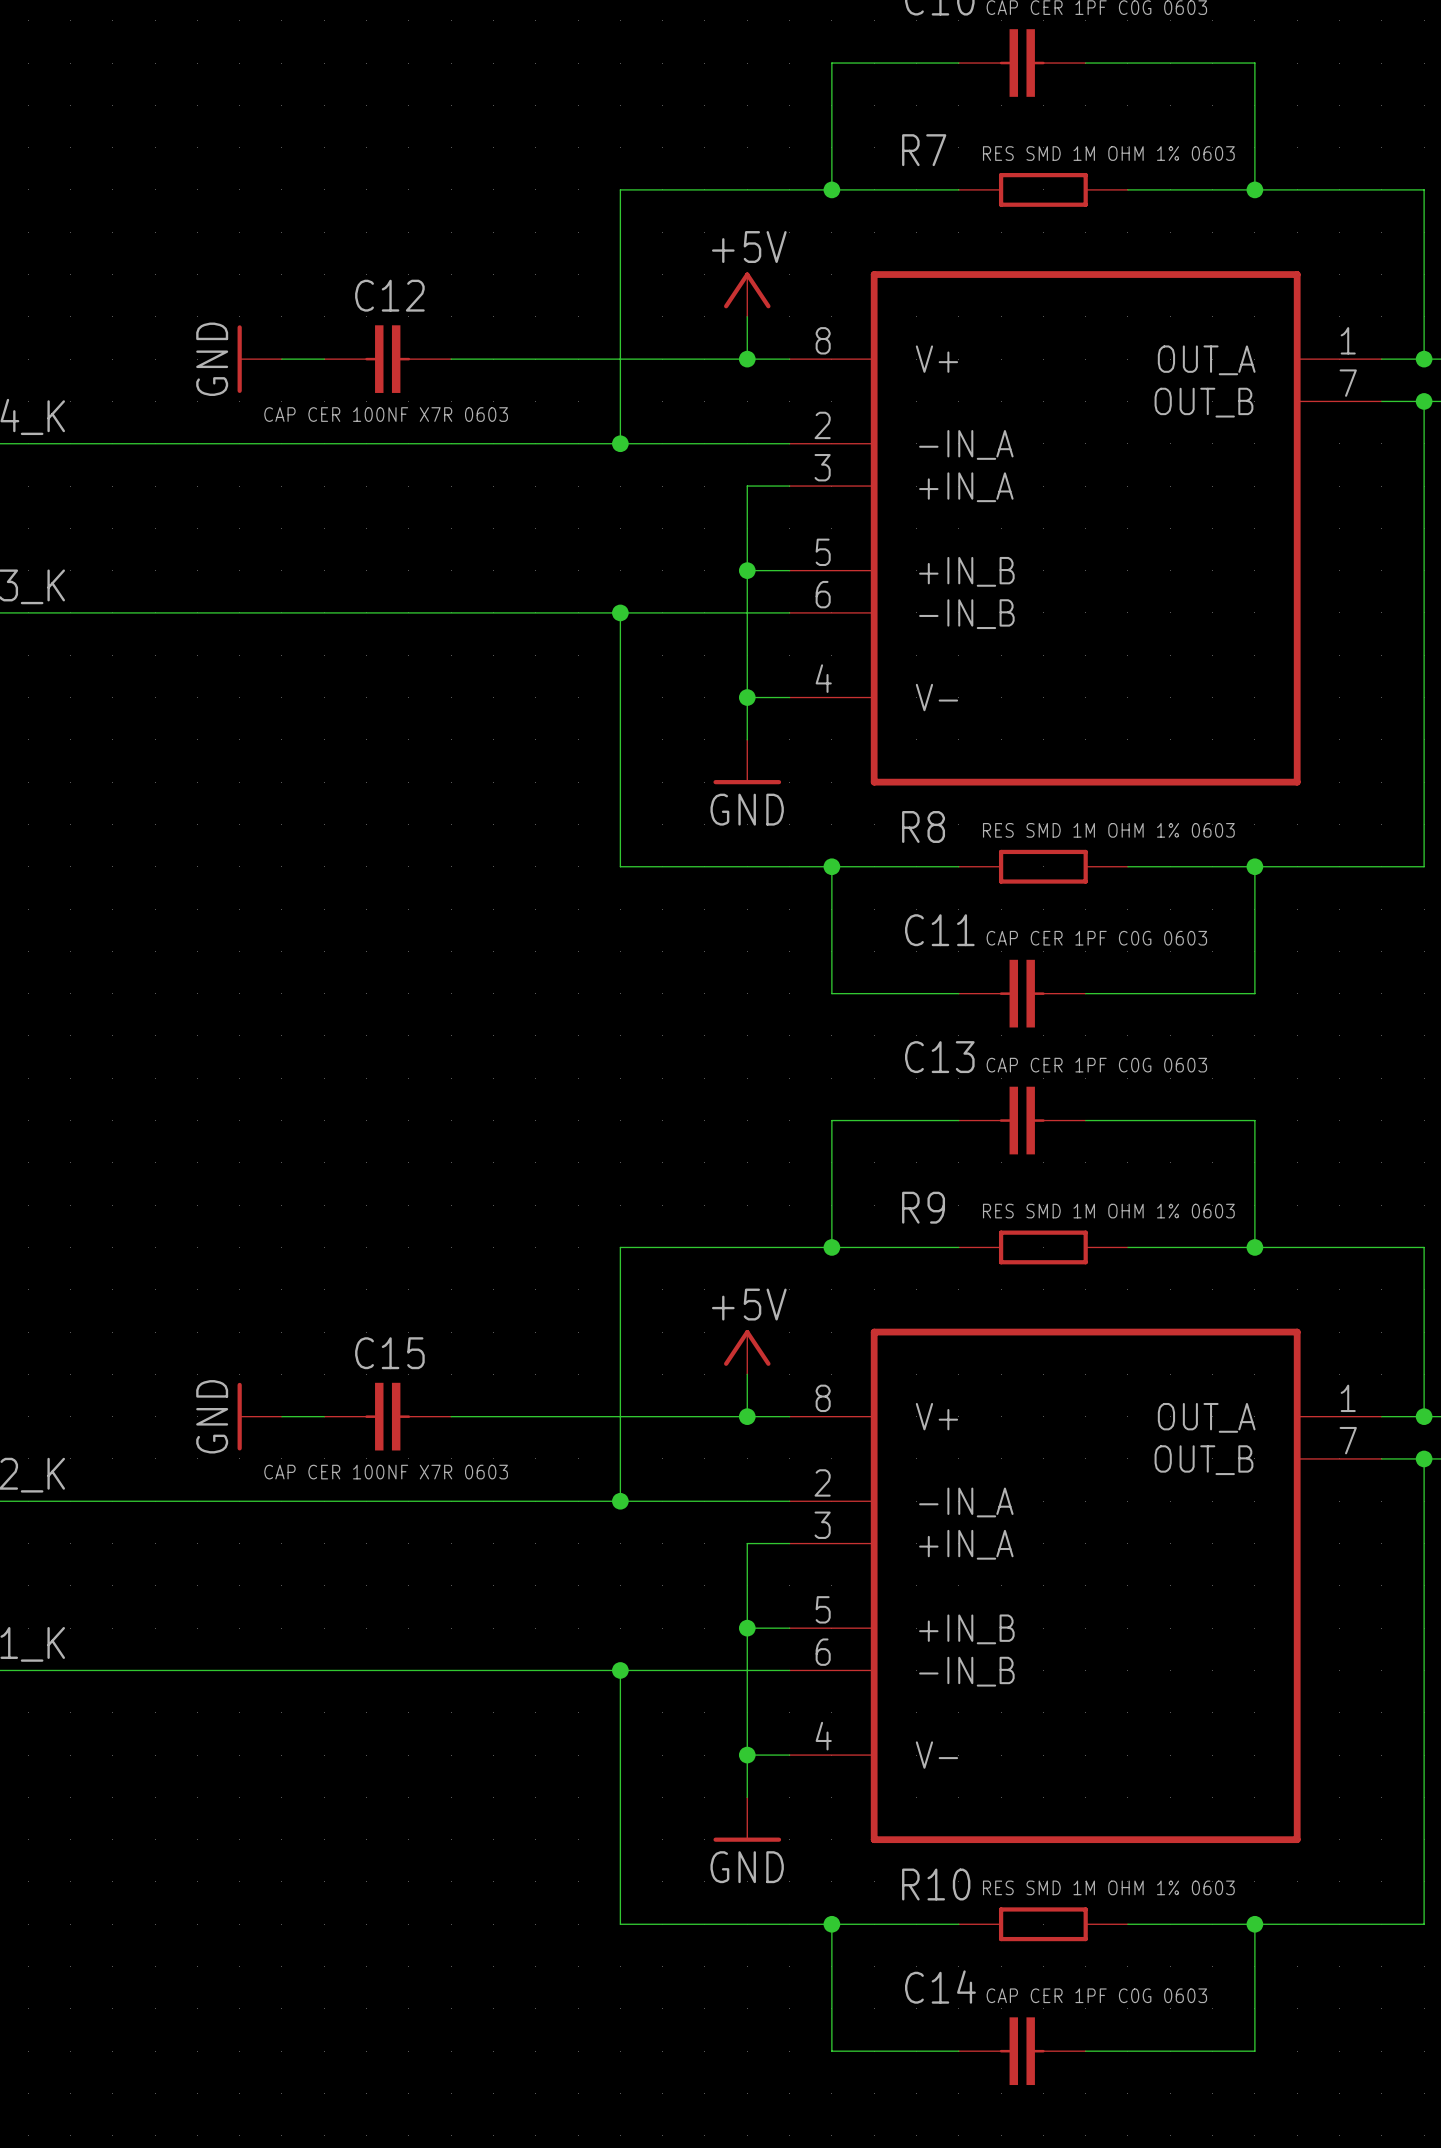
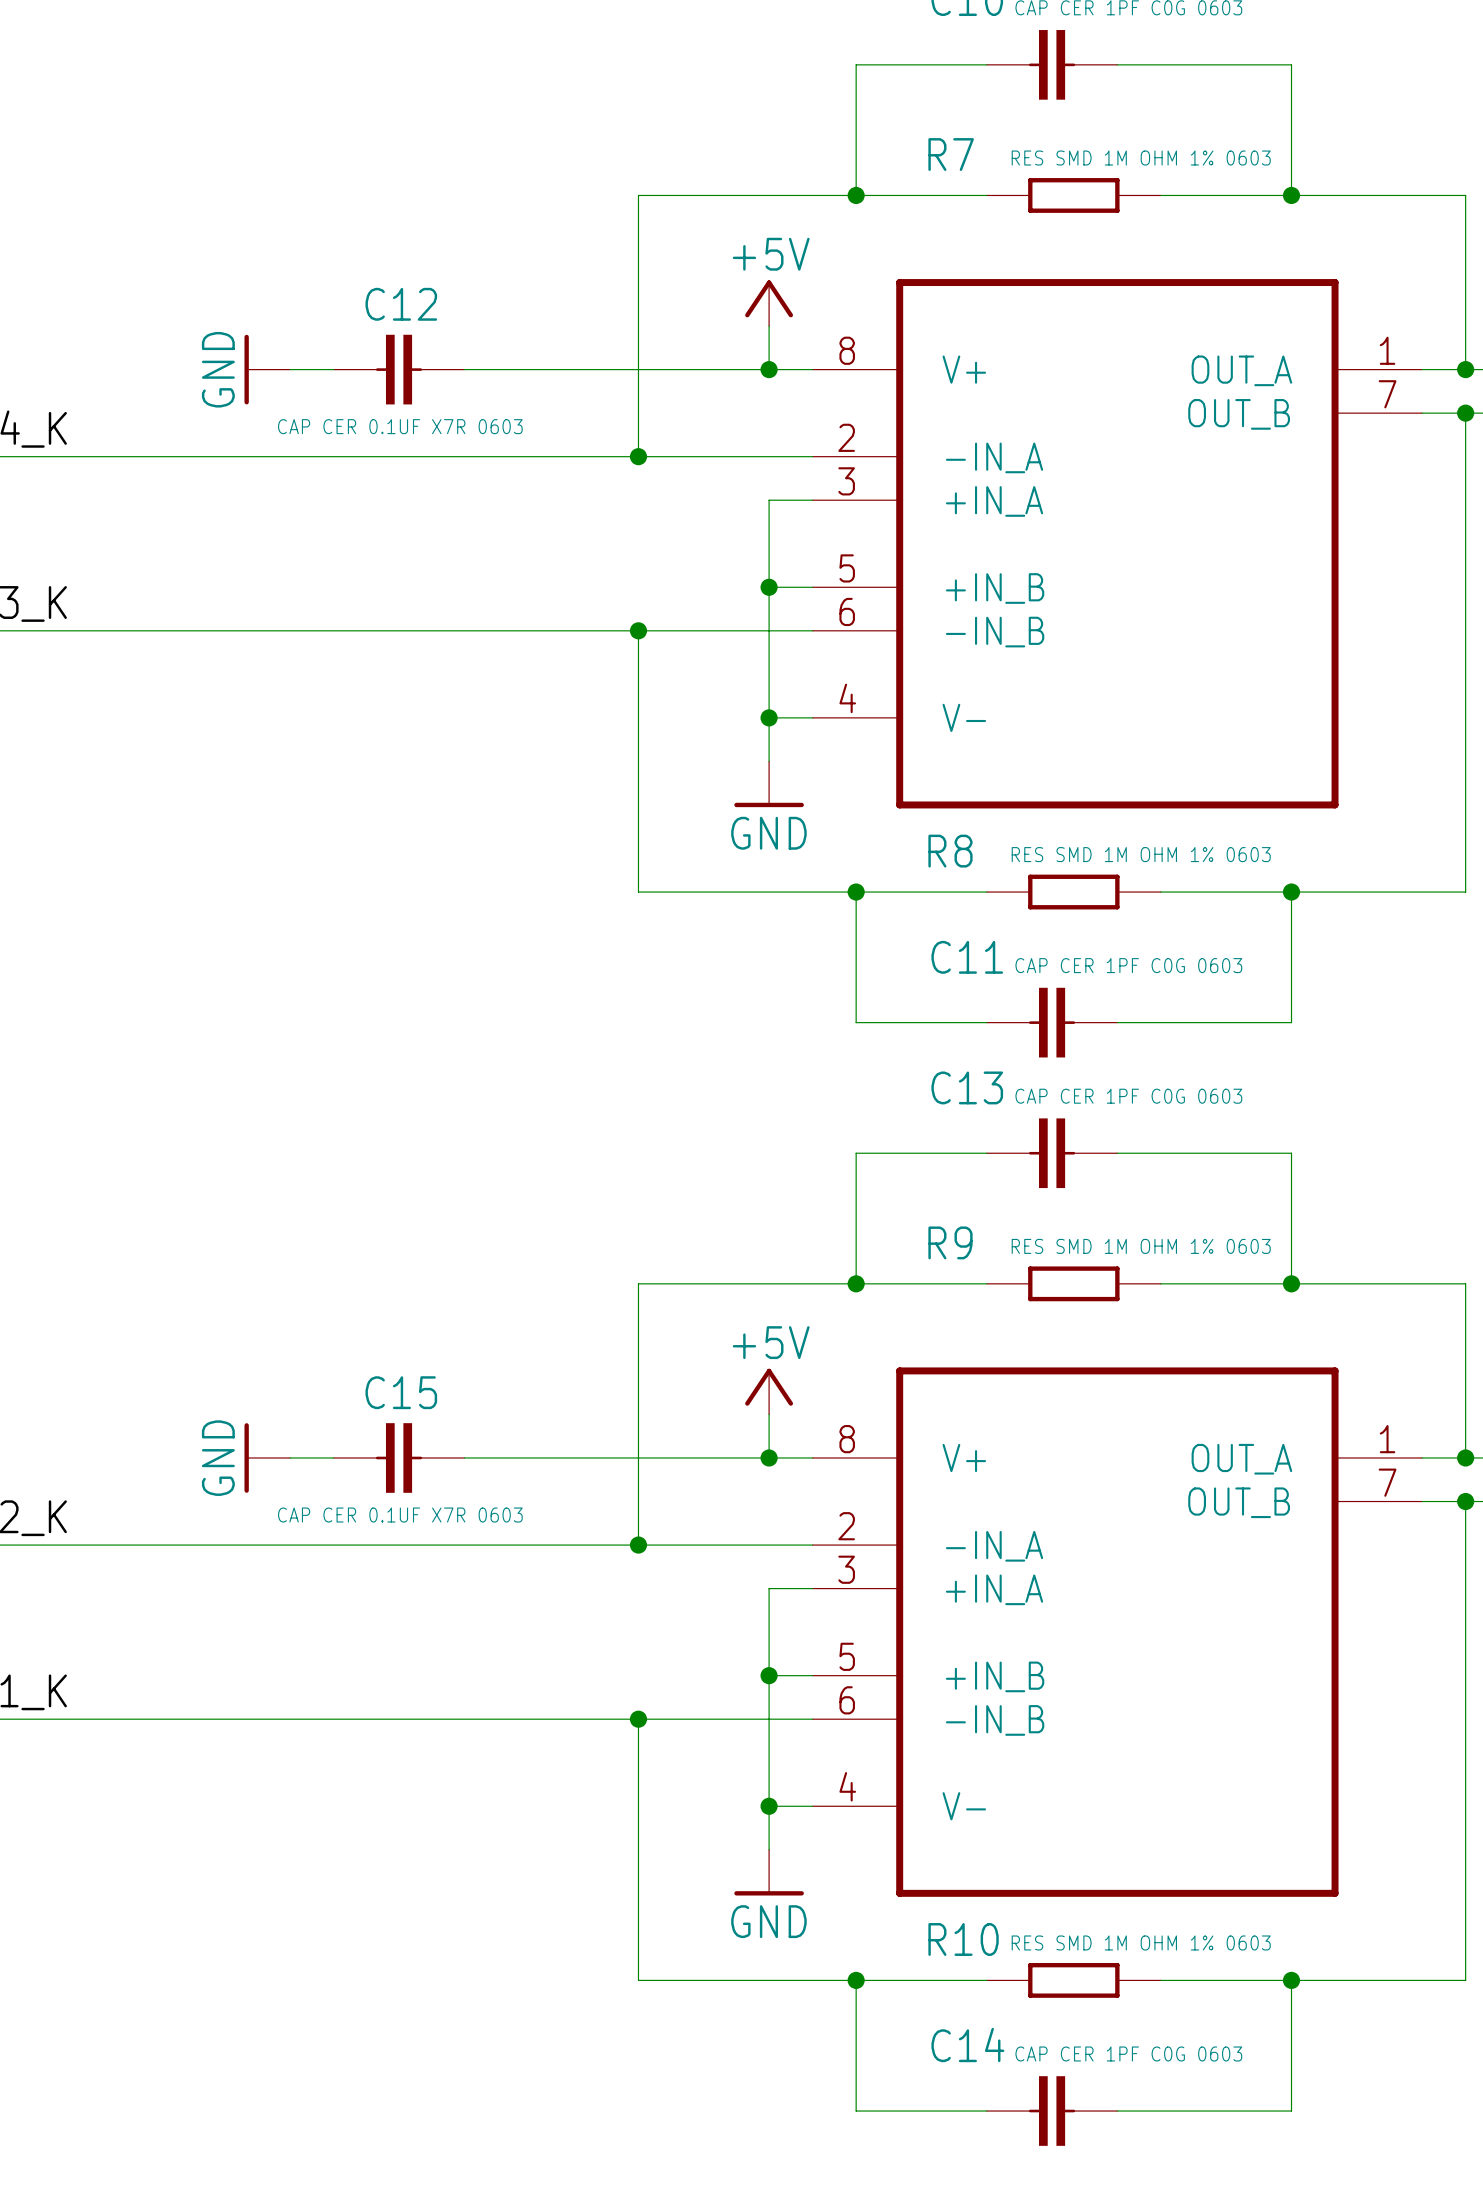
C12 value: CAP CER 100NF X7R 0603 (386, 414) -> CAP CER 0.1UF X7R 0603 (400, 426)
C15 value: CAP CER 100NF X7R 0603 (386, 1472) -> CAP CER 0.1UF X7R 0603 (400, 1515)

